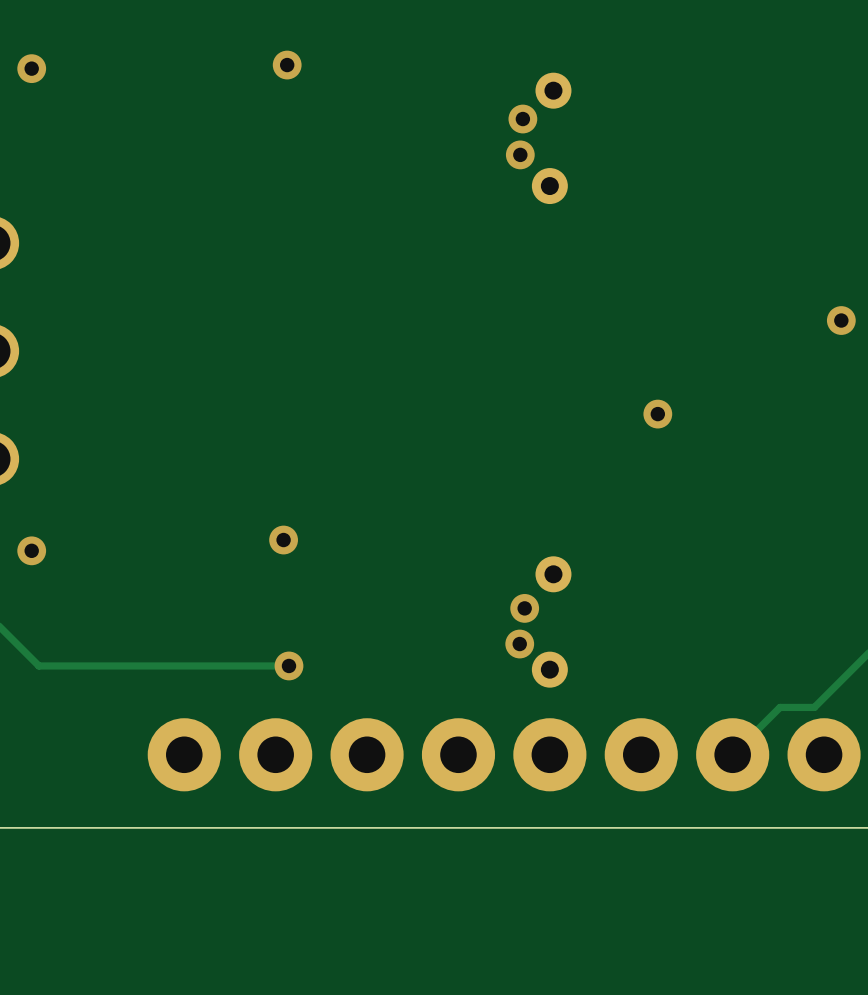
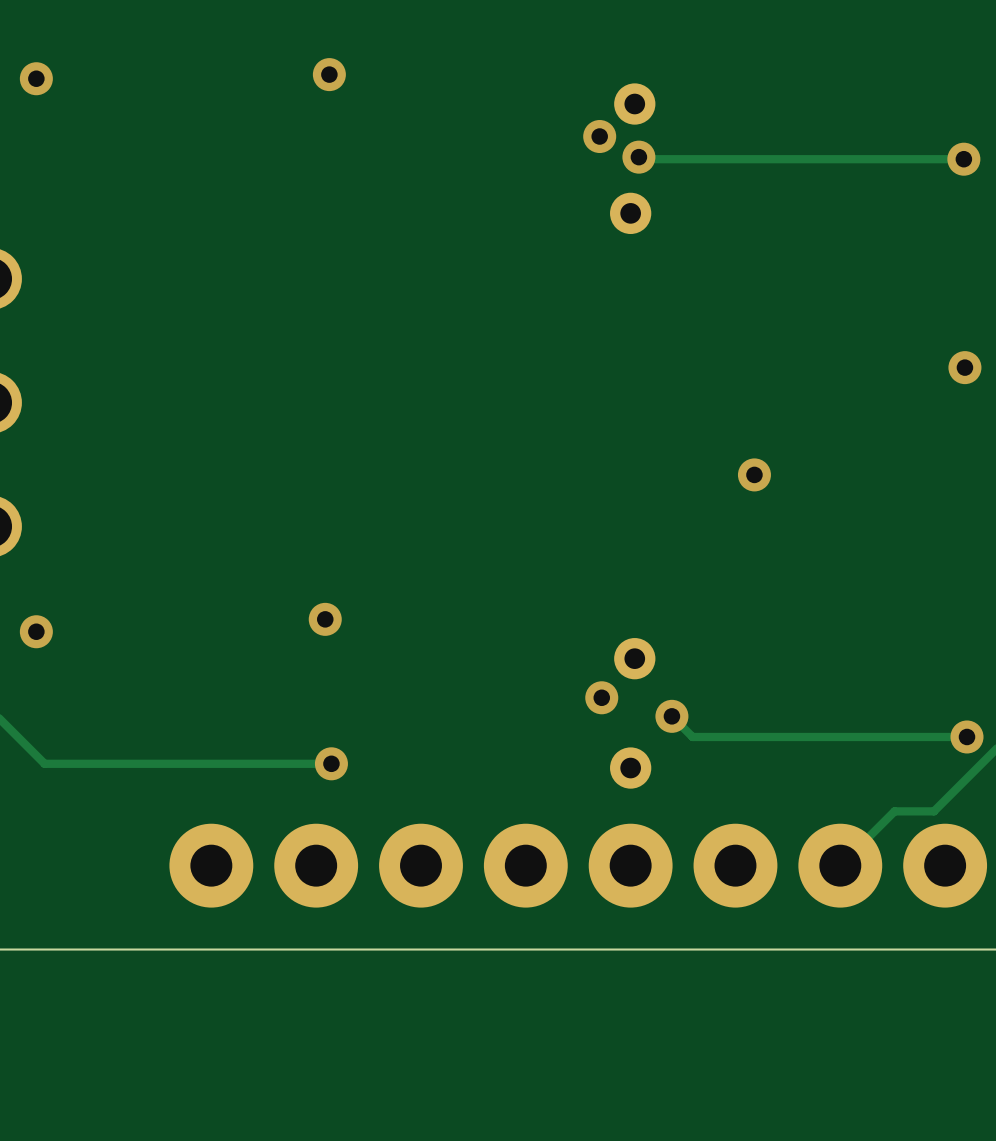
track: none -> (638, 157) (640, 159) (963, 159)
via: none -> (963, 159)
via position: (520, 154) -> (638, 157)
track: none -> (671, 716) (692, 736) (967, 736)
via: none -> (967, 736)
via position: (519, 644) -> (671, 716)

